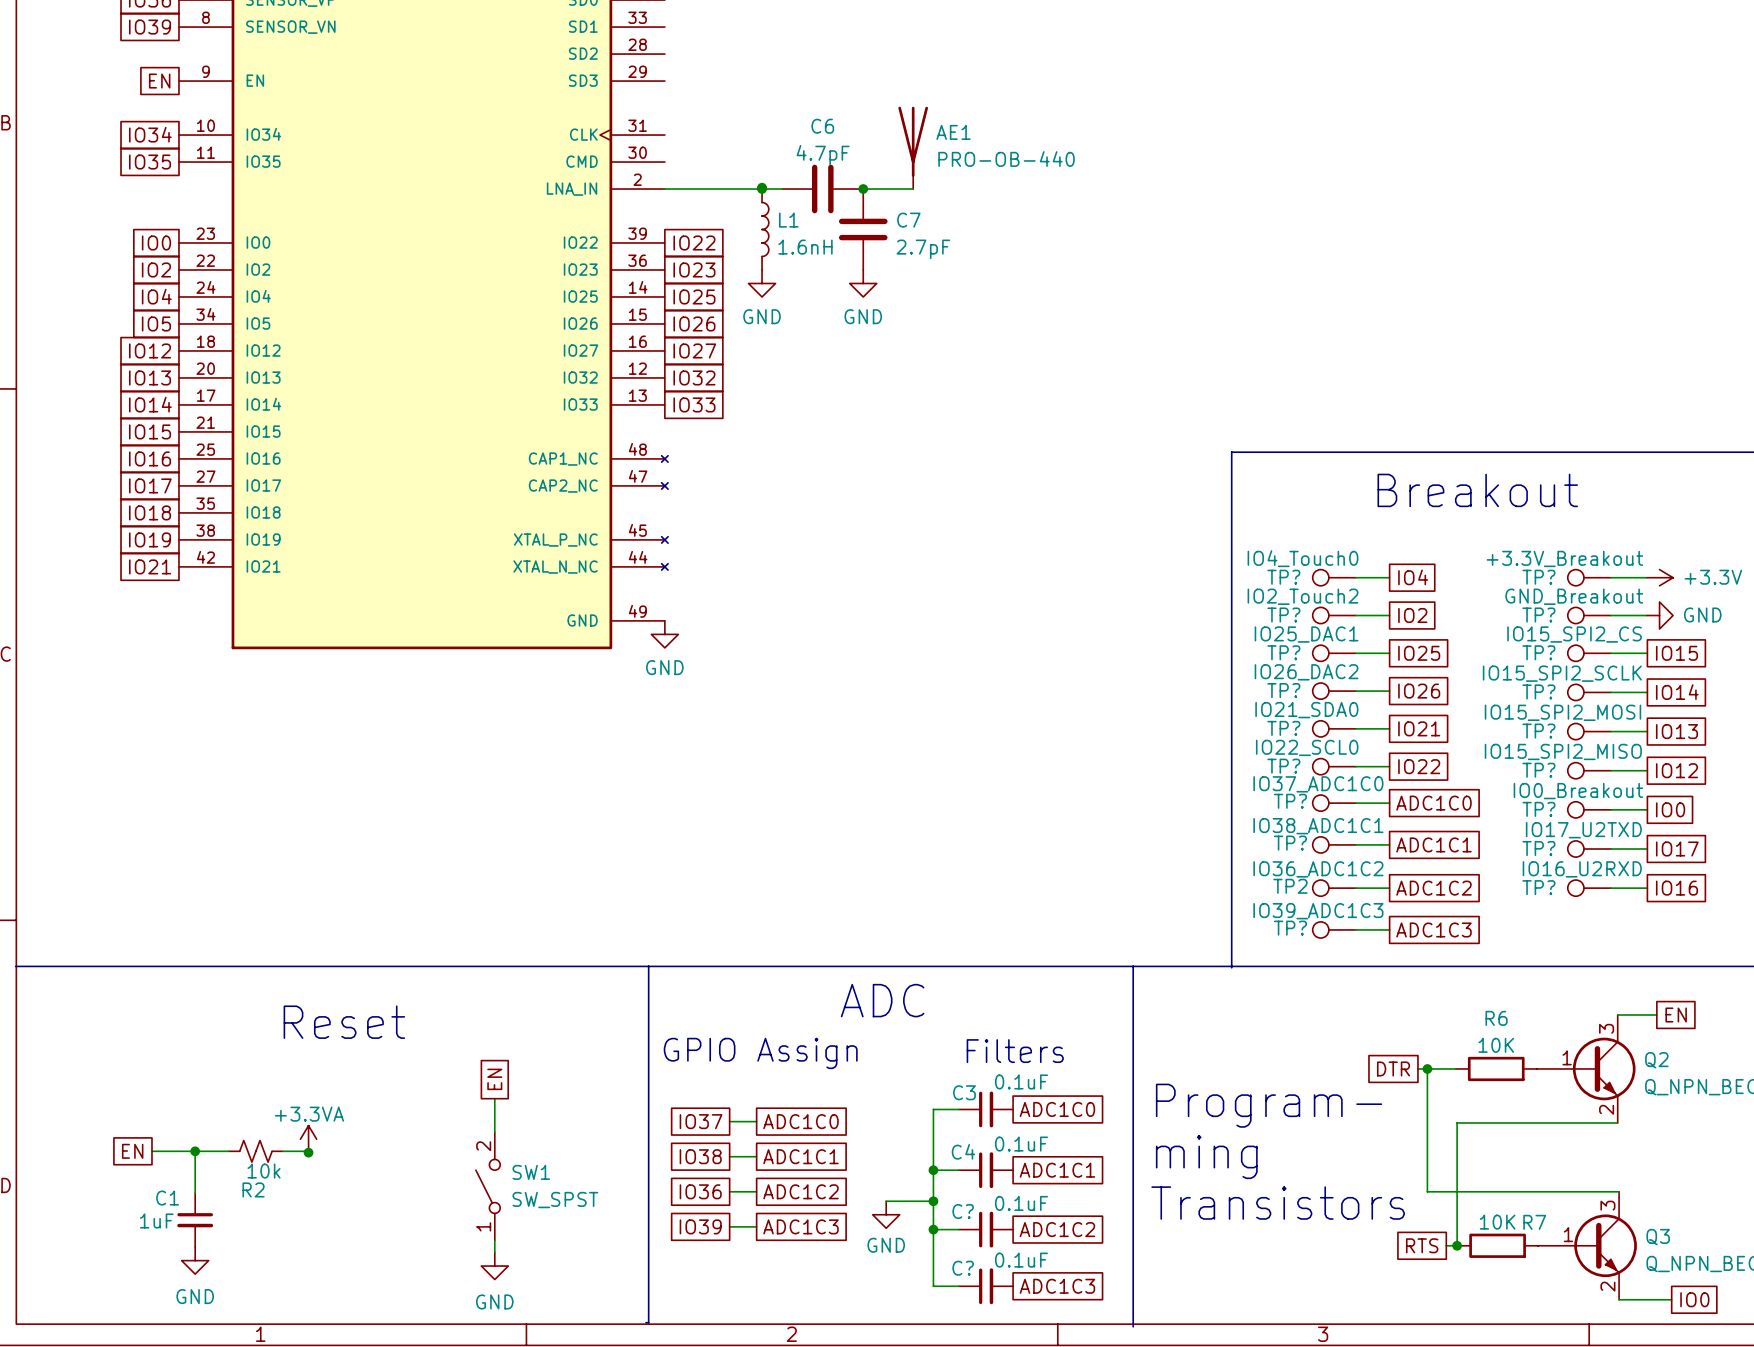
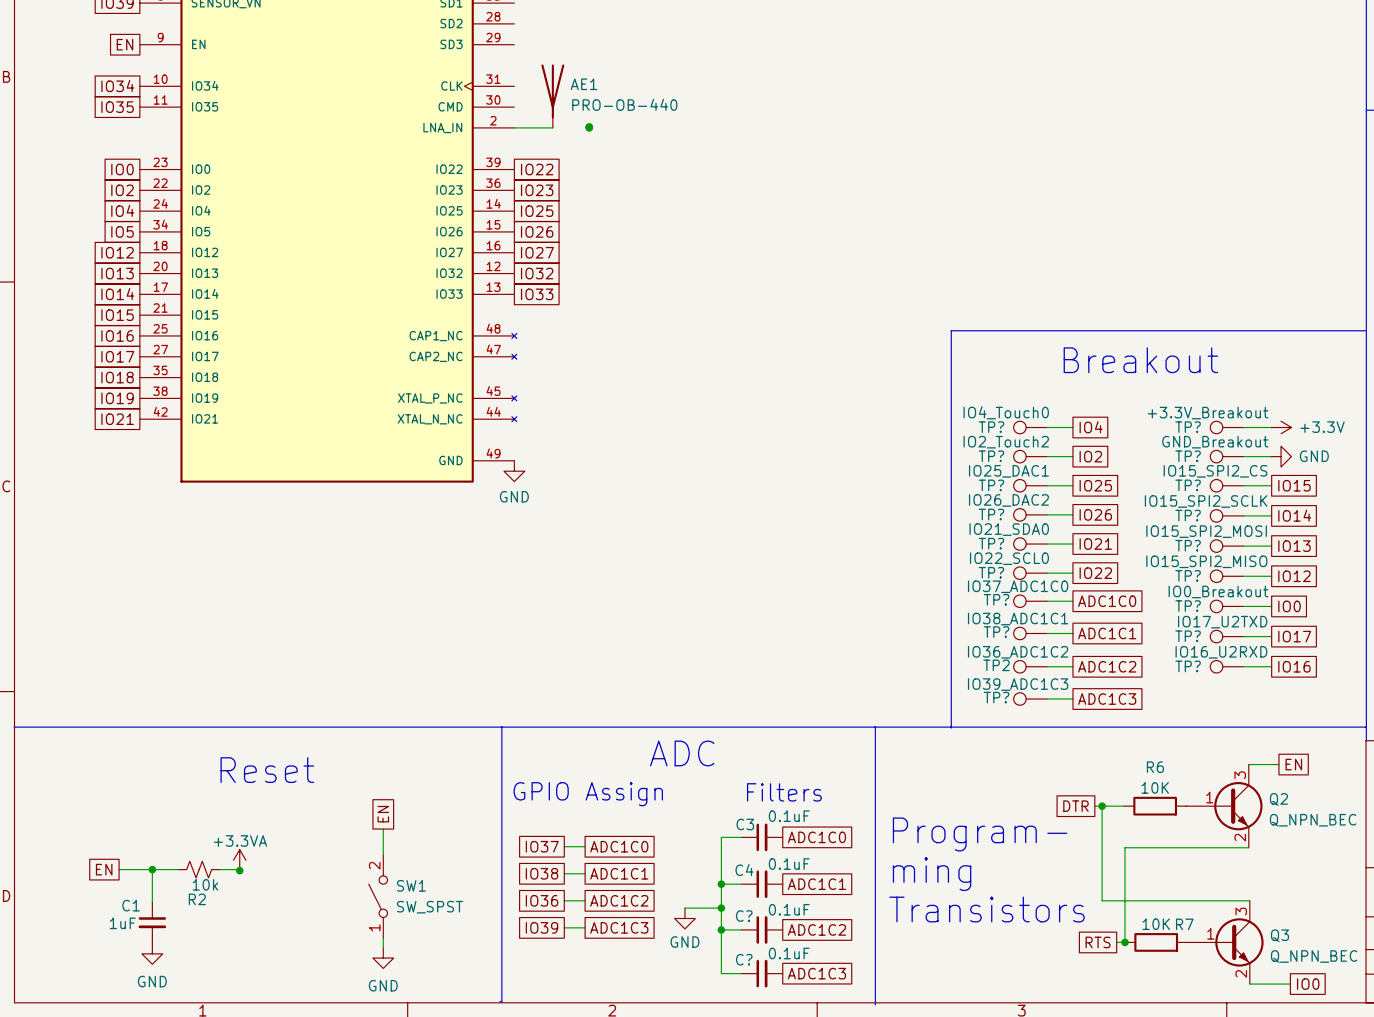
AE1 position: (913, 147) -> (552, 96)
wire: (714, 189) (782, 189) -> none
C6: 4.7pF (822, 189) -> none
wire: (863, 189) (913, 189) -> none
junction: (863, 189) -> none
L1: 1.6nH (765, 229) -> none
C7: 2.7pF (863, 229) -> none
power symbol: GND (762, 283) -> none
power symbol: GND (863, 283) -> none

